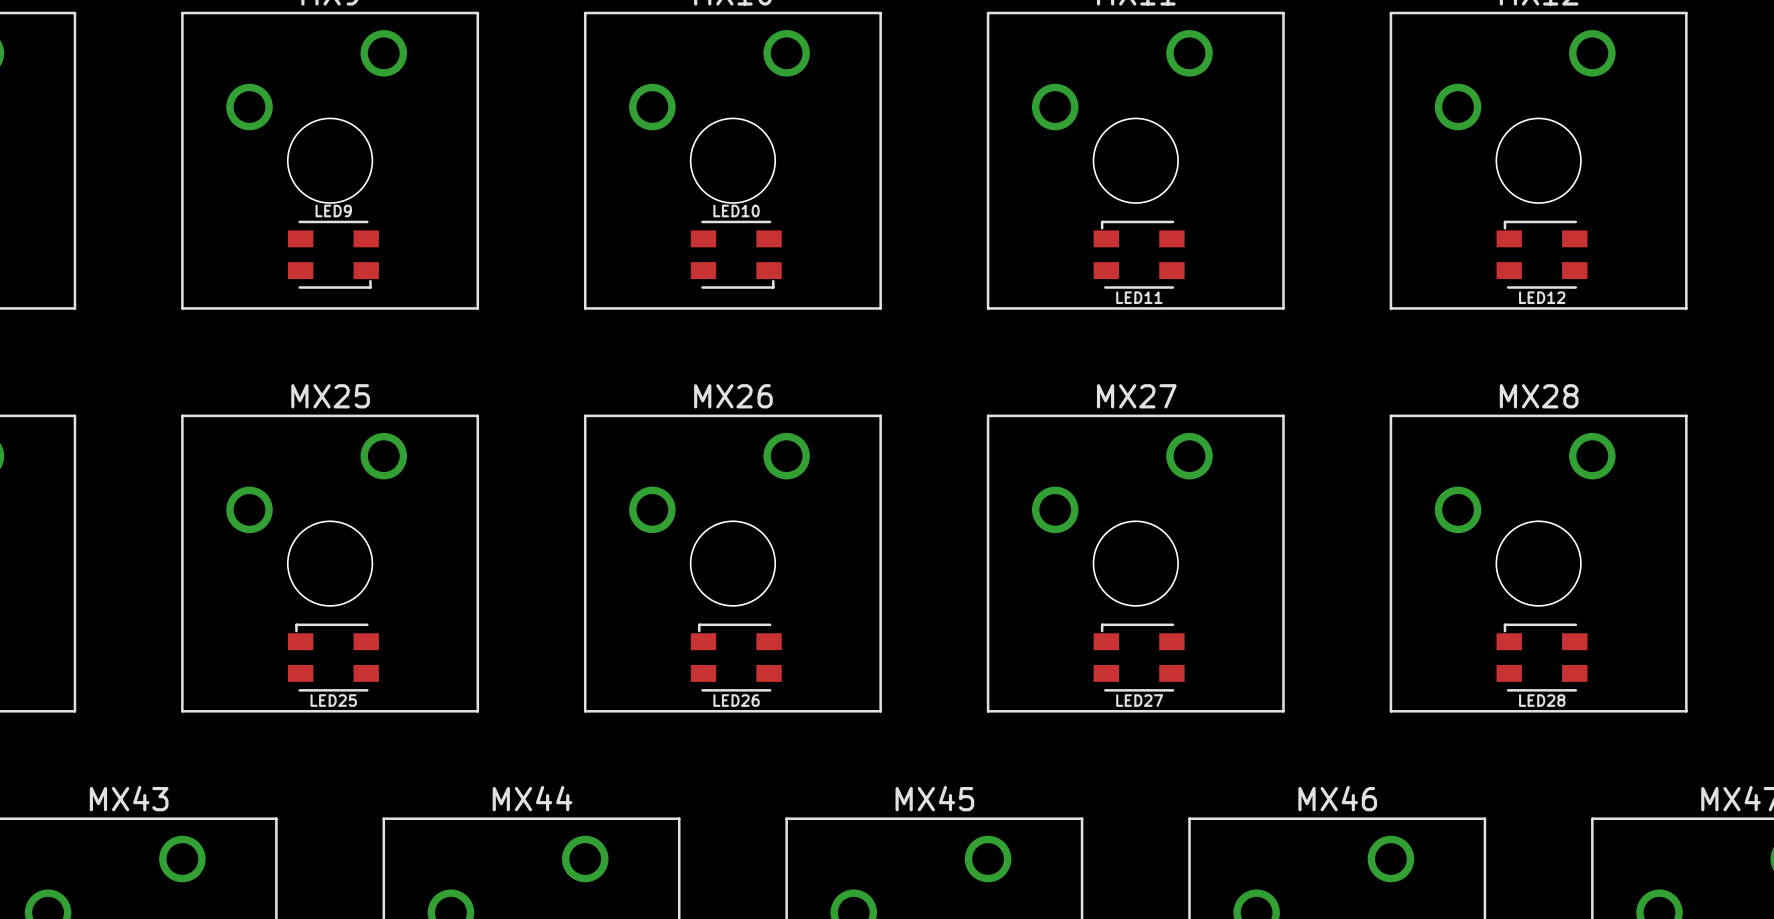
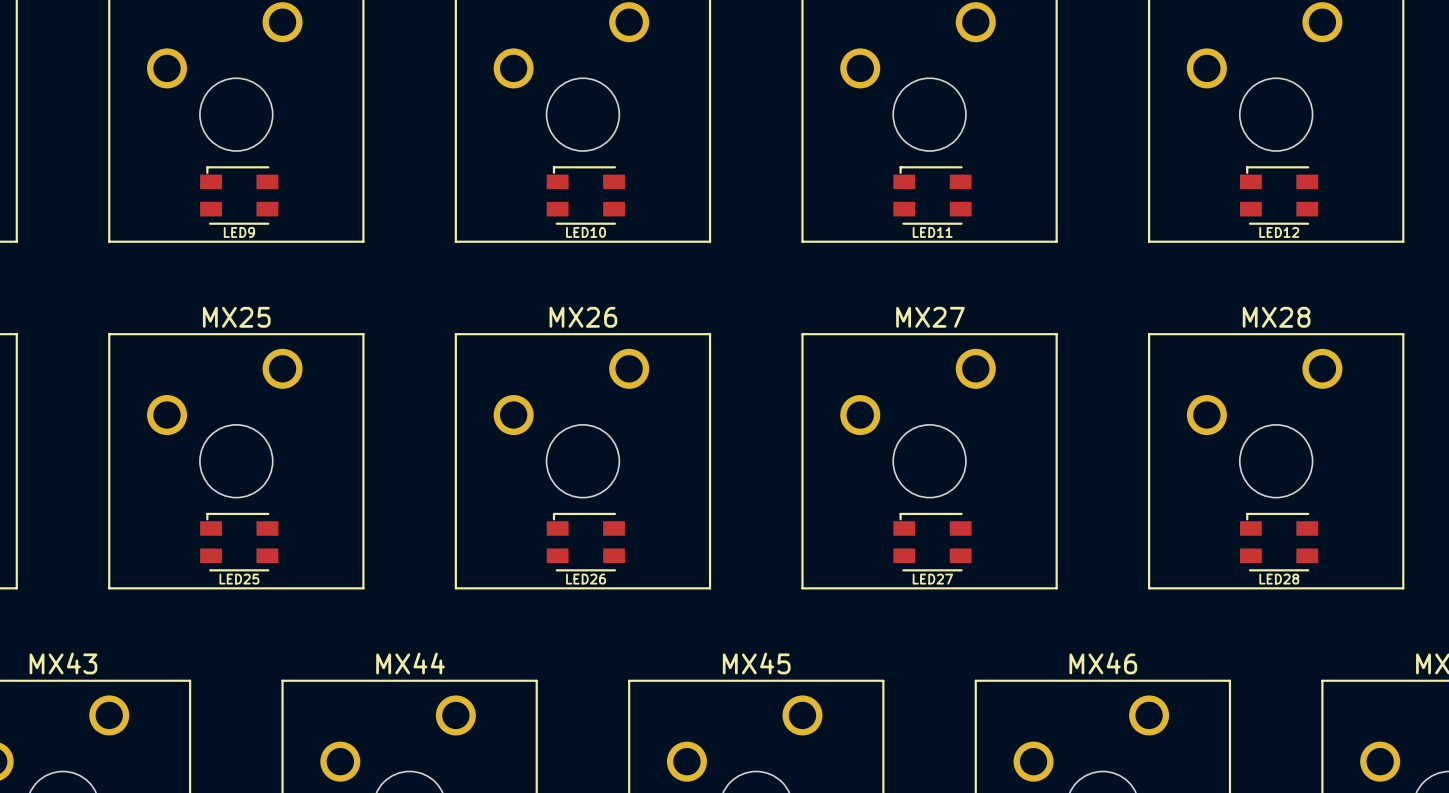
LED9 rotation: 0° (333, 254) -> 180° (239, 195)
LED10 rotation: 0° (736, 254) -> 180° (585, 195)

